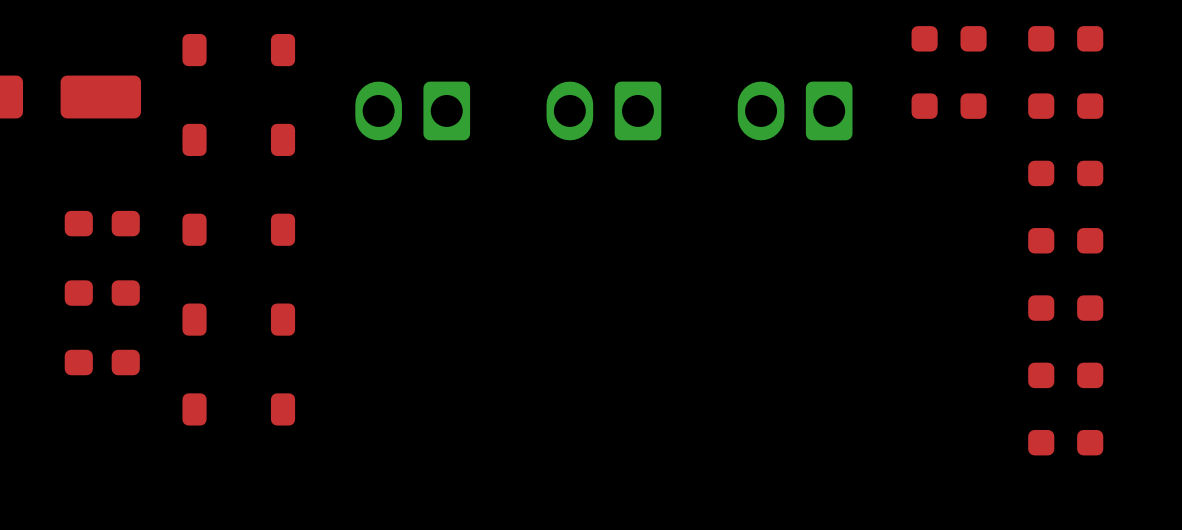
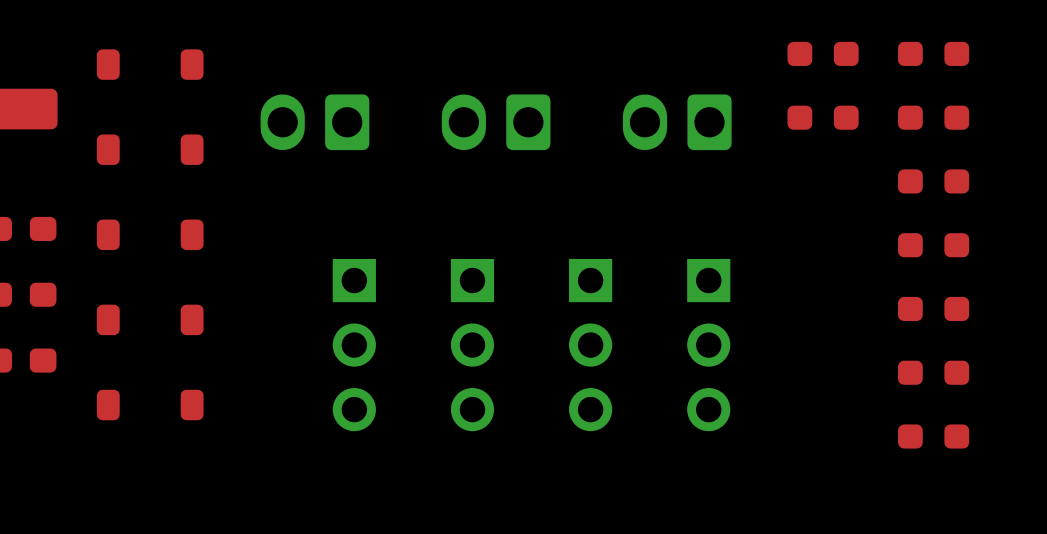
part: none -> (354, 345)
part: none -> (472, 345)
part: none -> (590, 345)
part: none -> (708, 345)

